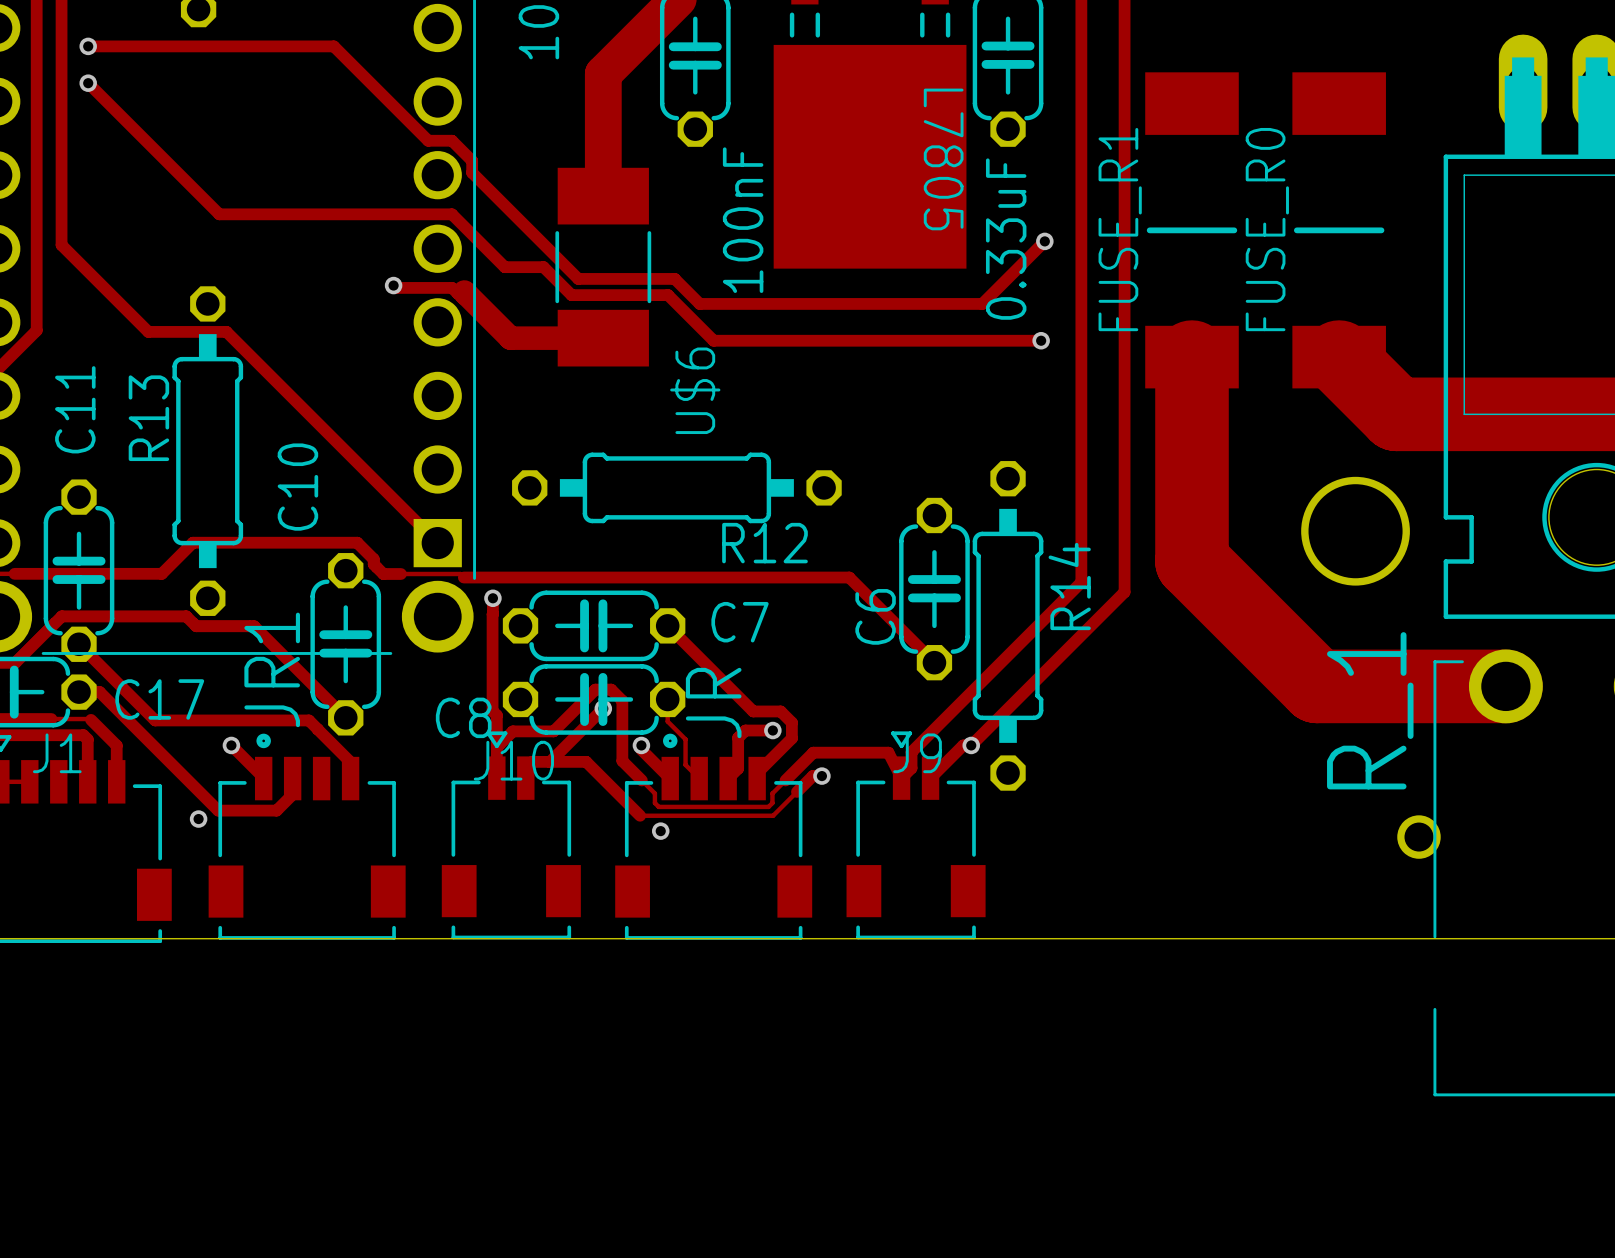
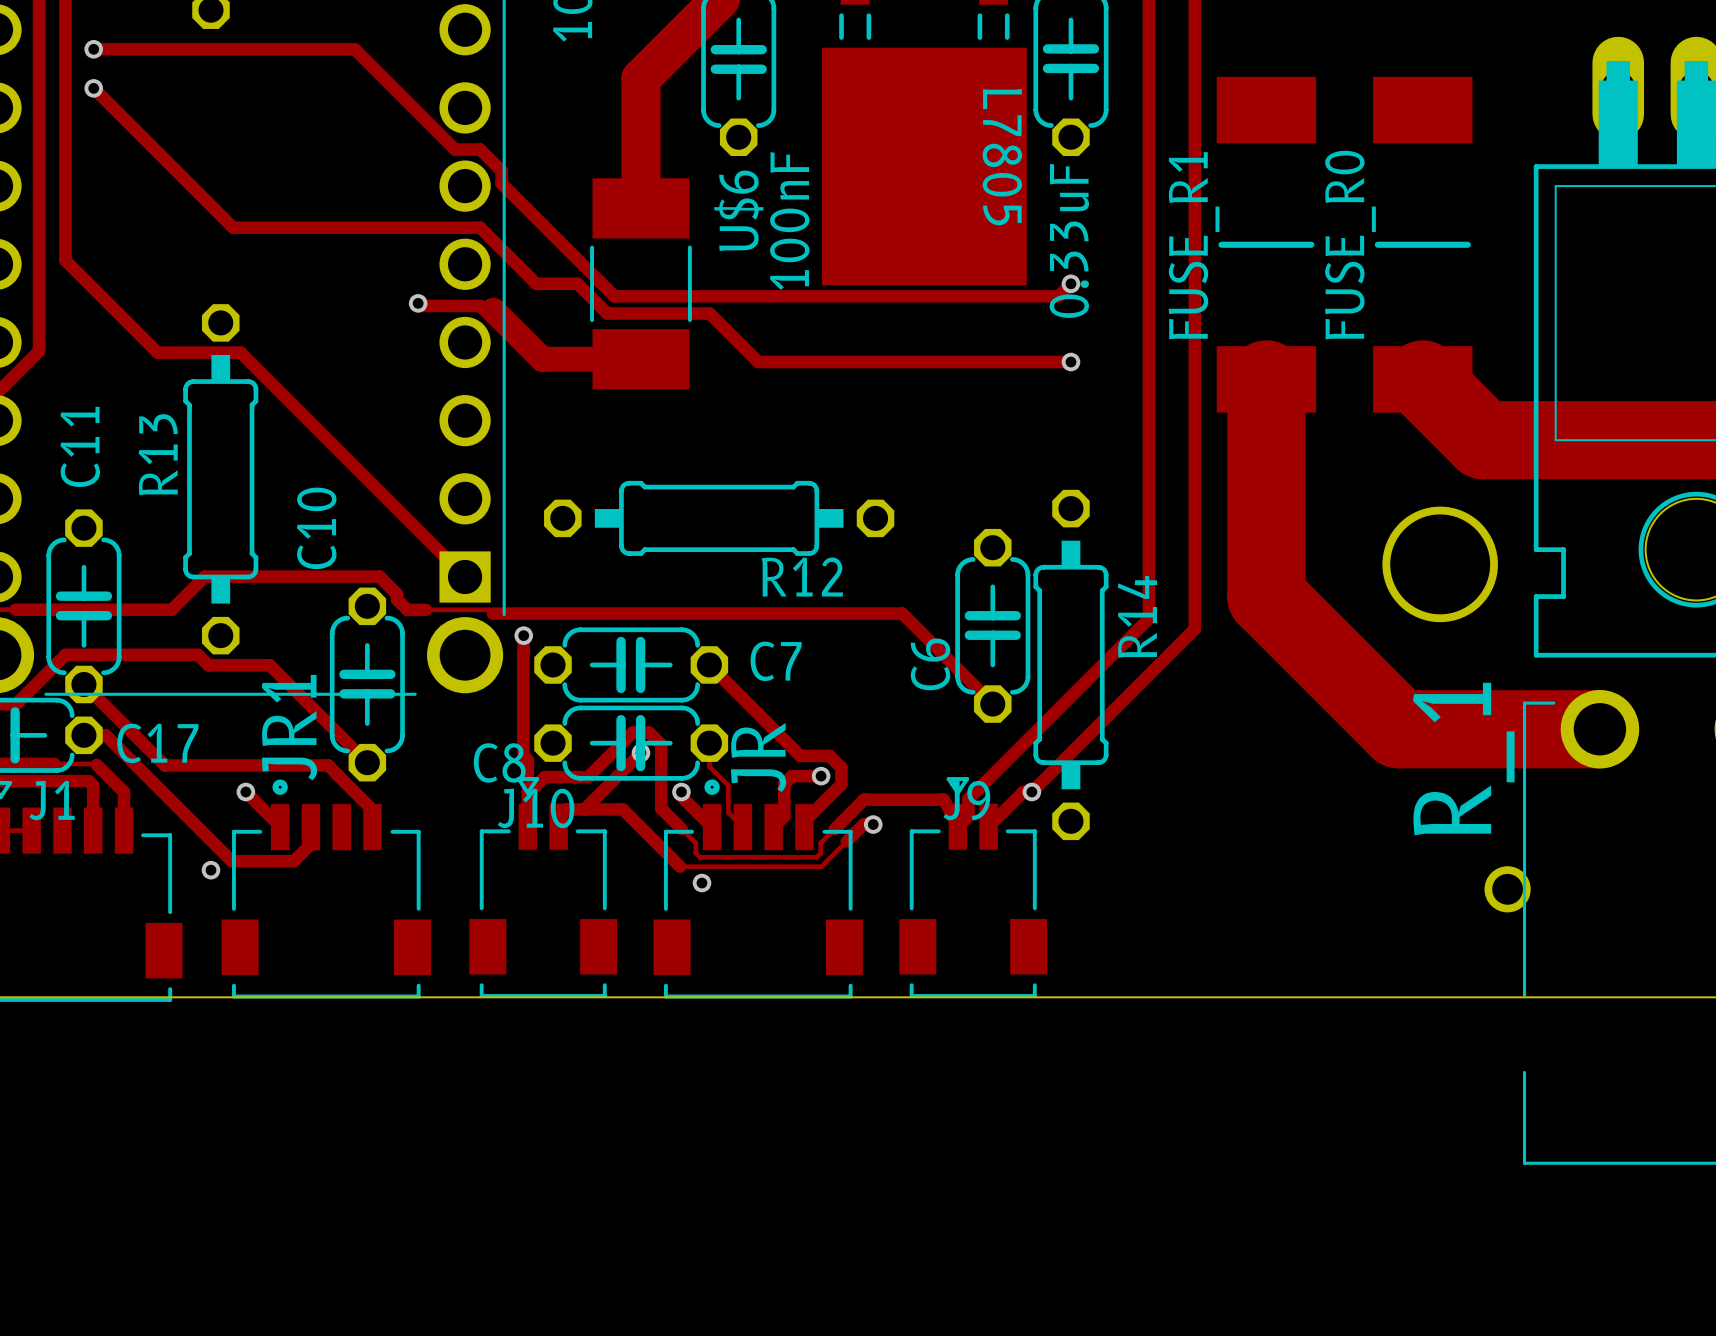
track: (1044, 241) (982, 303) (699, 303) (674, 278) -> (1070, 283) (1058, 296) (716, 296)
via: (1044, 241) -> none
via: none -> (1070, 283)
track: (1008, 340) (1041, 340) -> none
via position: (1041, 340) -> (1070, 362)
U$6 name position: U$6 (695, 390) -> U$6 (738, 210)

